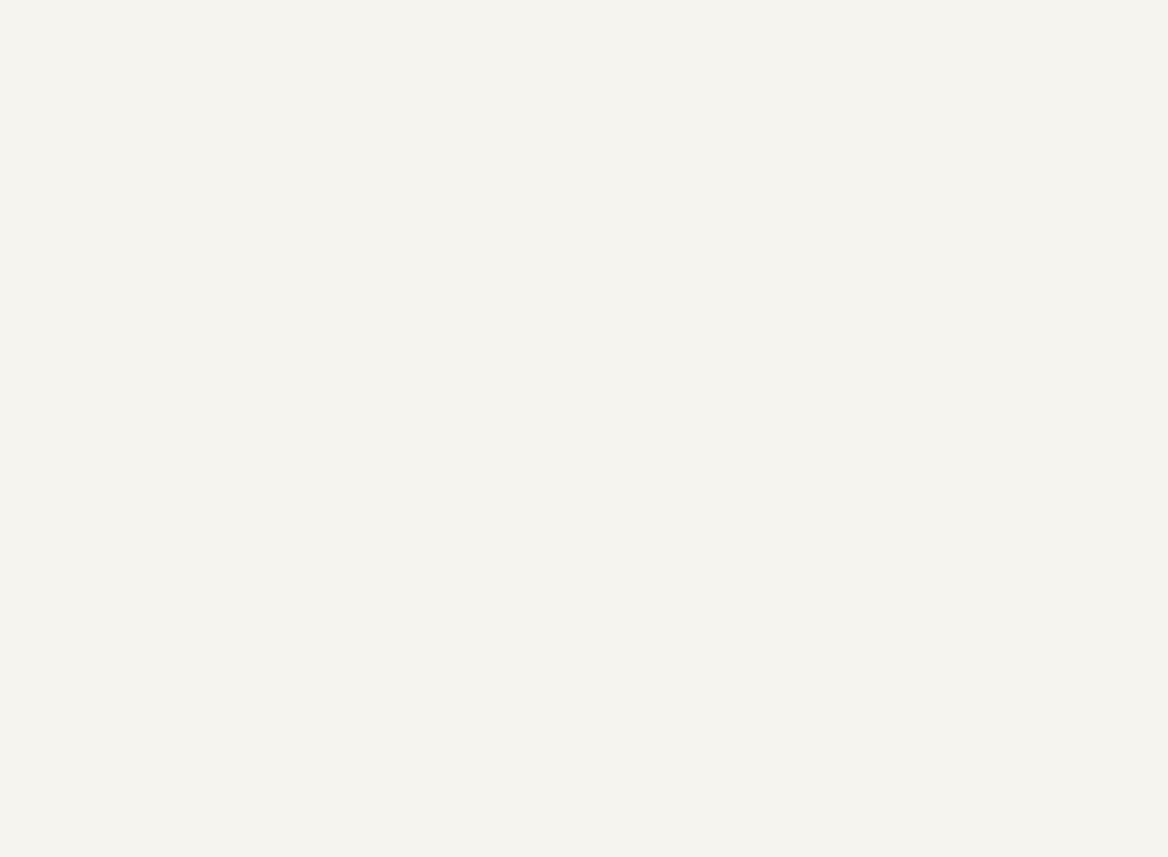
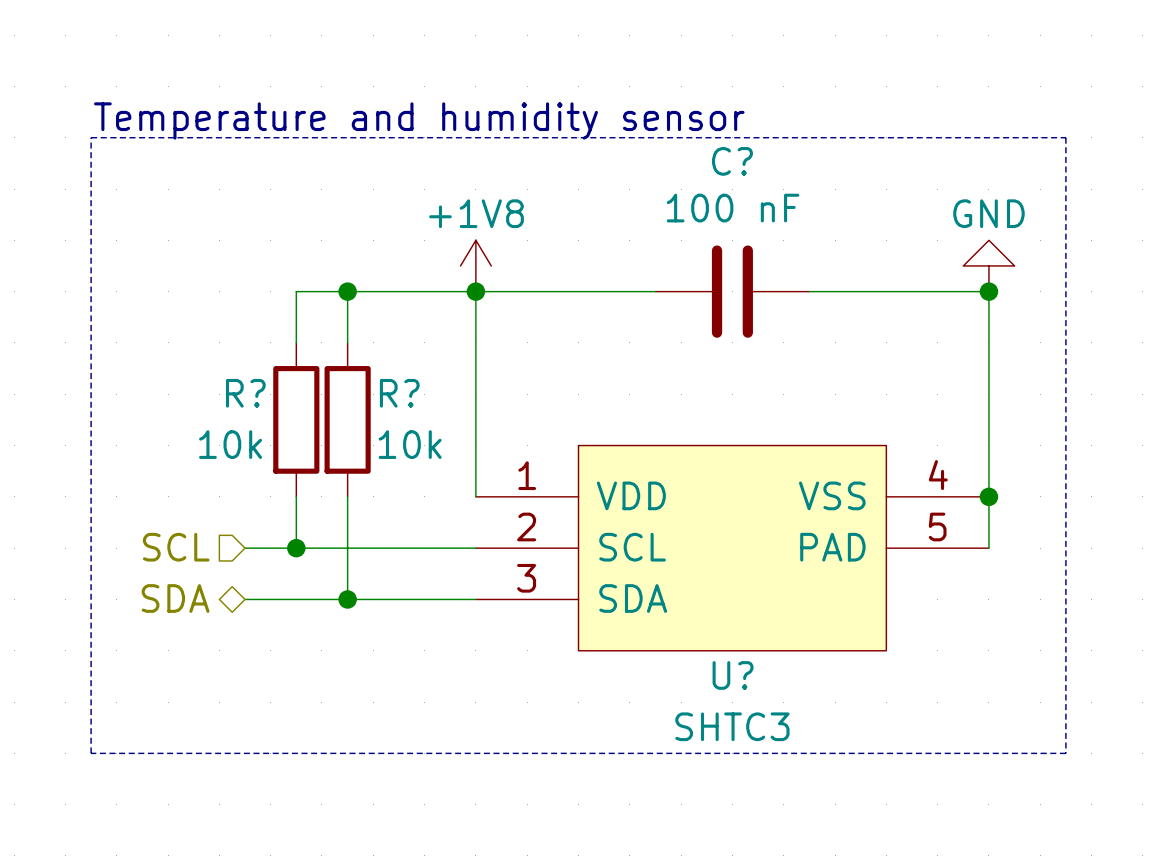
text: none -> Temperature and humidity sensor (419, 120)
line: none -> (91, 137) (91, 753) (1065, 753) (1065, 137) (91, 137)
power symbol: none -> +1V8 (475, 265)
power symbol: none -> GND (988, 265)
wire: none -> (347, 291) (347, 342)
junction: none -> (347, 291)
wire: none -> (475, 291) (475, 496)
junction: none -> (475, 291)
wire: none -> (655, 291) (296, 291) (296, 342)
C?: none -> 100 nF (732, 291)
wire: none -> (809, 291) (988, 291) (988, 548)
junction: none -> (988, 291)
R?: none -> 10k (296, 419)
R?: none -> 10k (347, 419)
wire: none -> (296, 496) (296, 548)
wire: none -> (347, 496) (347, 599)
junction: none -> (988, 496)
hierarchical label: none -> SCL (176, 547)
wire: none -> (245, 548) (475, 548)
junction: none -> (296, 548)
U?: none -> SHTC3 (732, 548)
hierarchical label: none -> SDA (175, 598)
wire: none -> (245, 599) (475, 599)
junction: none -> (347, 599)

